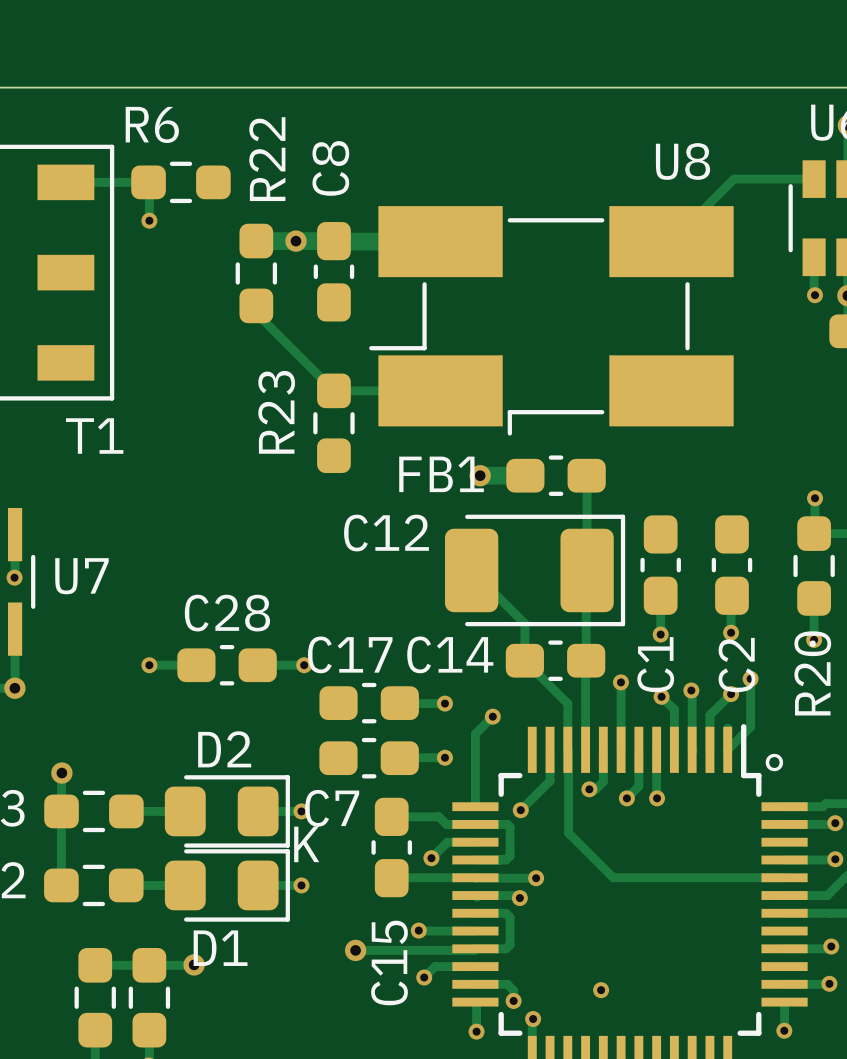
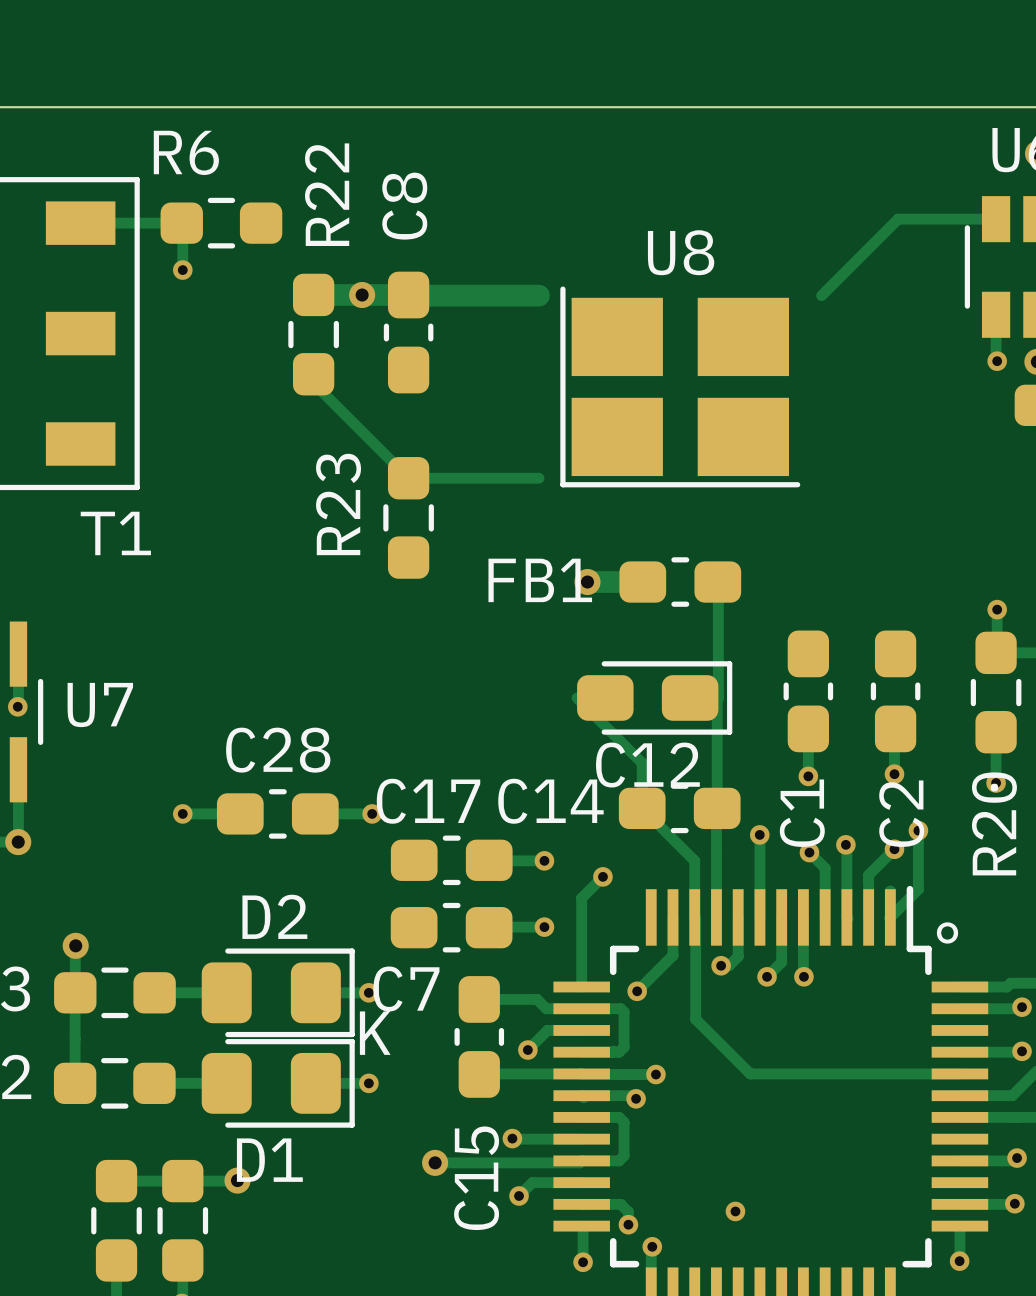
U8 name position: U8 (683, 161) -> U8 (681, 252)
U8 footprint: [369, 206, 734, 436] -> [560, 286, 801, 488]
C12 footprint: [444, 514, 626, 627] -> [577, 661, 733, 735]
C12 name position: C12 (386, 533) -> C12 (647, 765)

